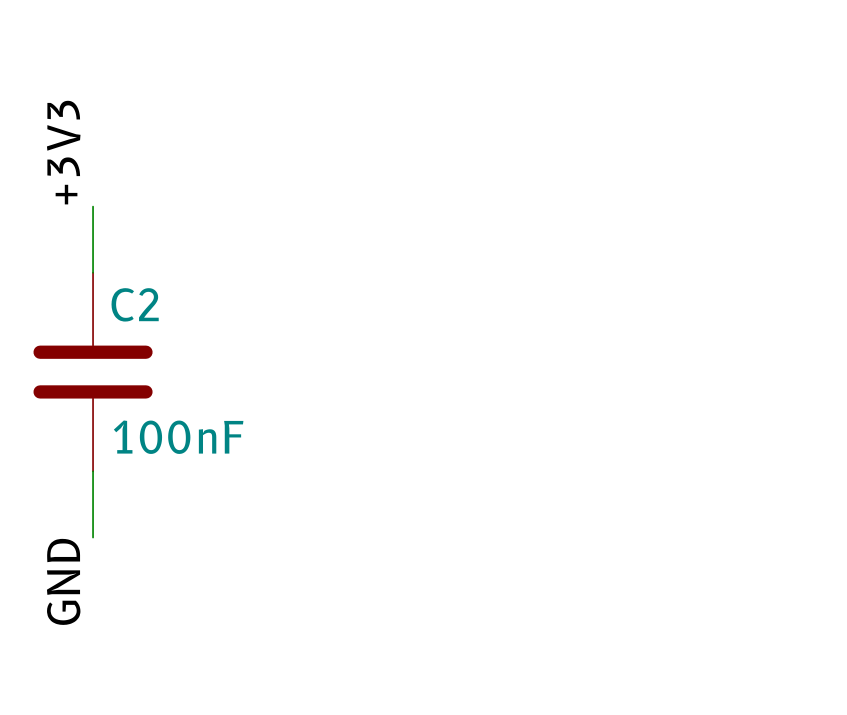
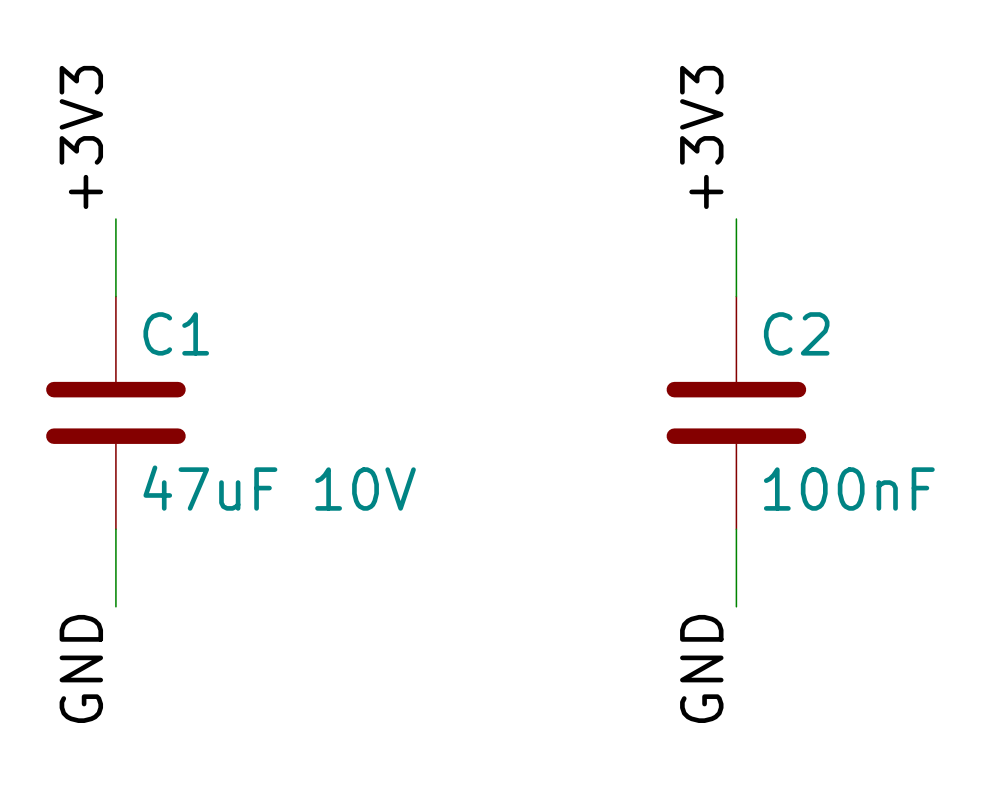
label: none -> +3V3 (701, 137)
wire: none -> (736, 219) (736, 296)
C2 name: C2 (135, 304) -> C1 (176, 333)
C2: none -> 100nF (736, 412)
C2 value: 100nF (178, 437) -> 47uF 10V (279, 488)
wire: none -> (736, 529) (736, 606)
label: none -> GND (701, 668)

